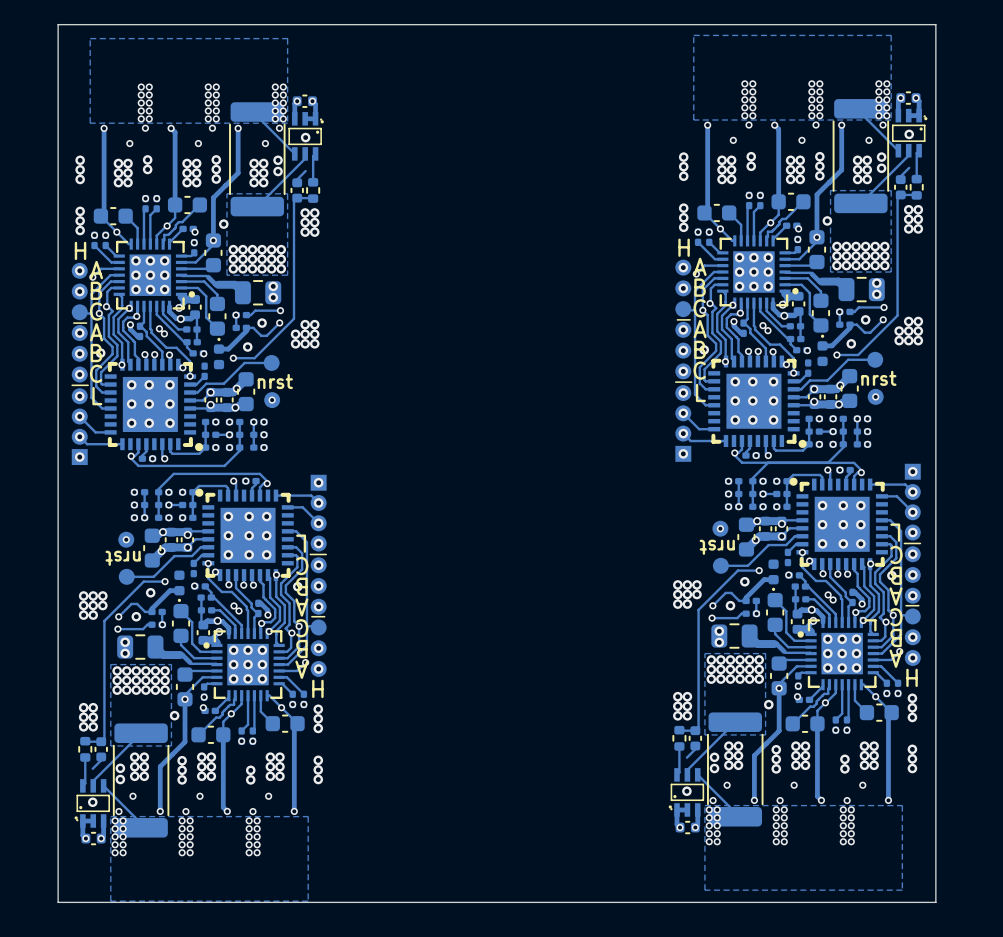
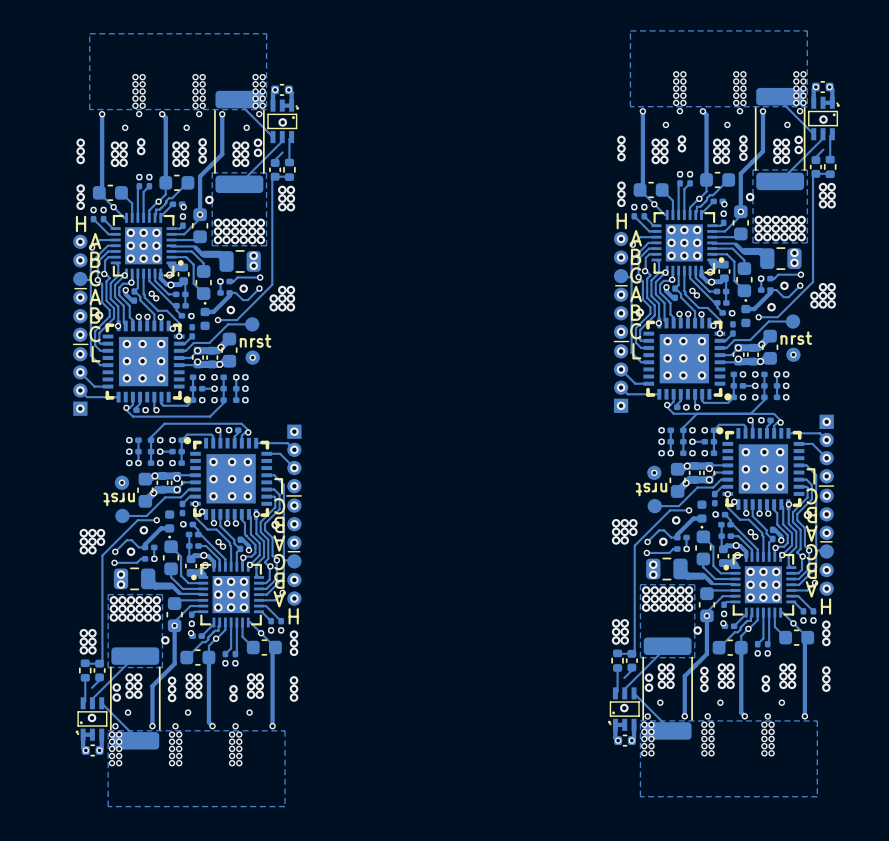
board edge: (935, 24) (58, 24) (58, 902) (935, 902) (935, 24) -> none

